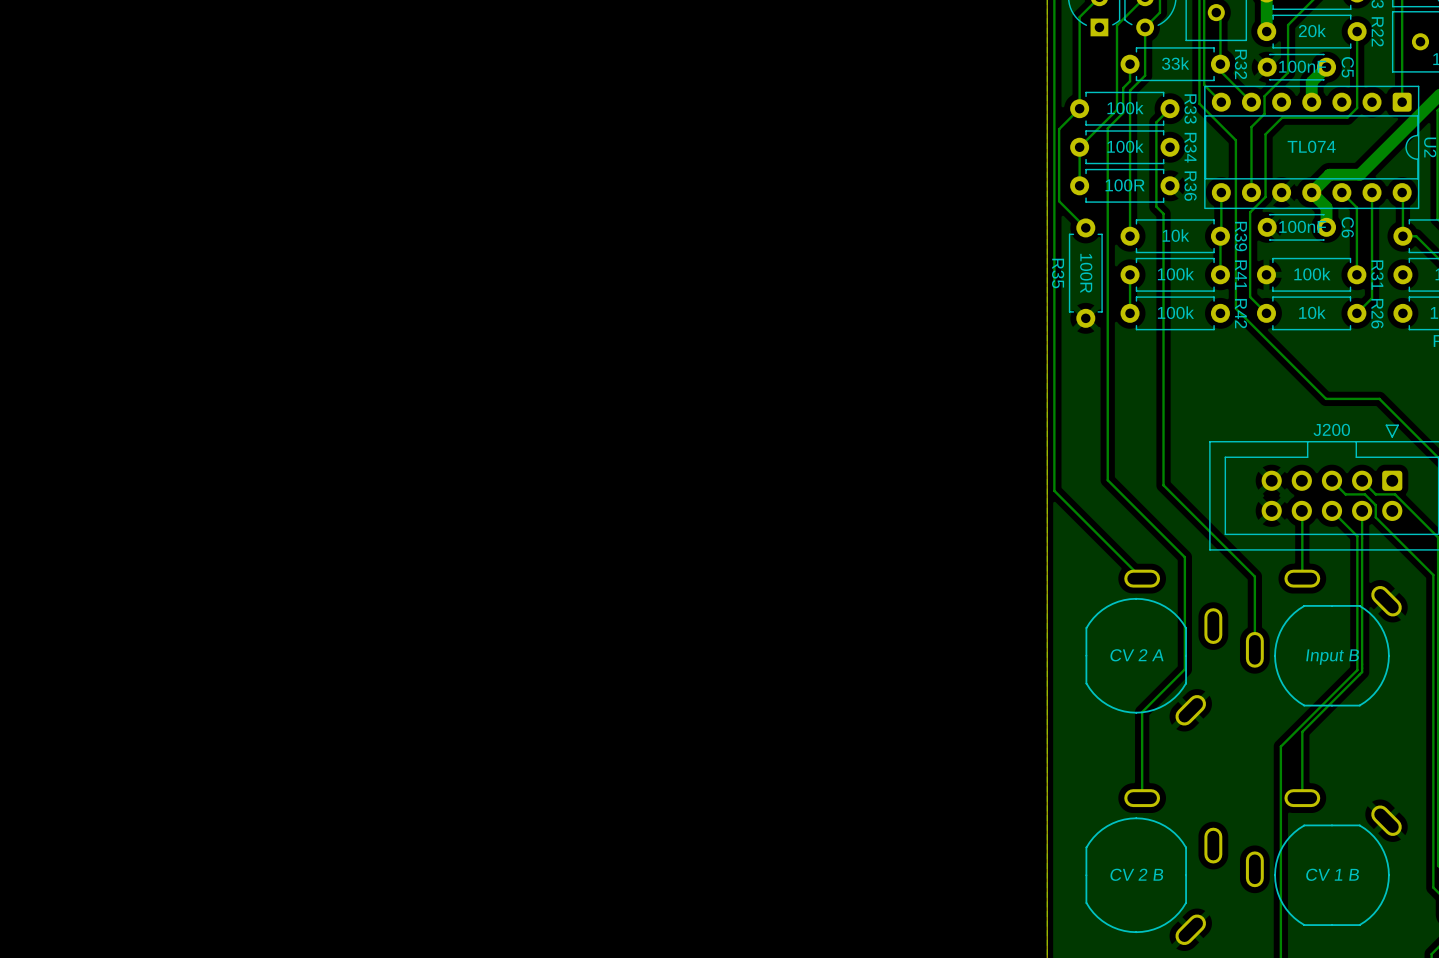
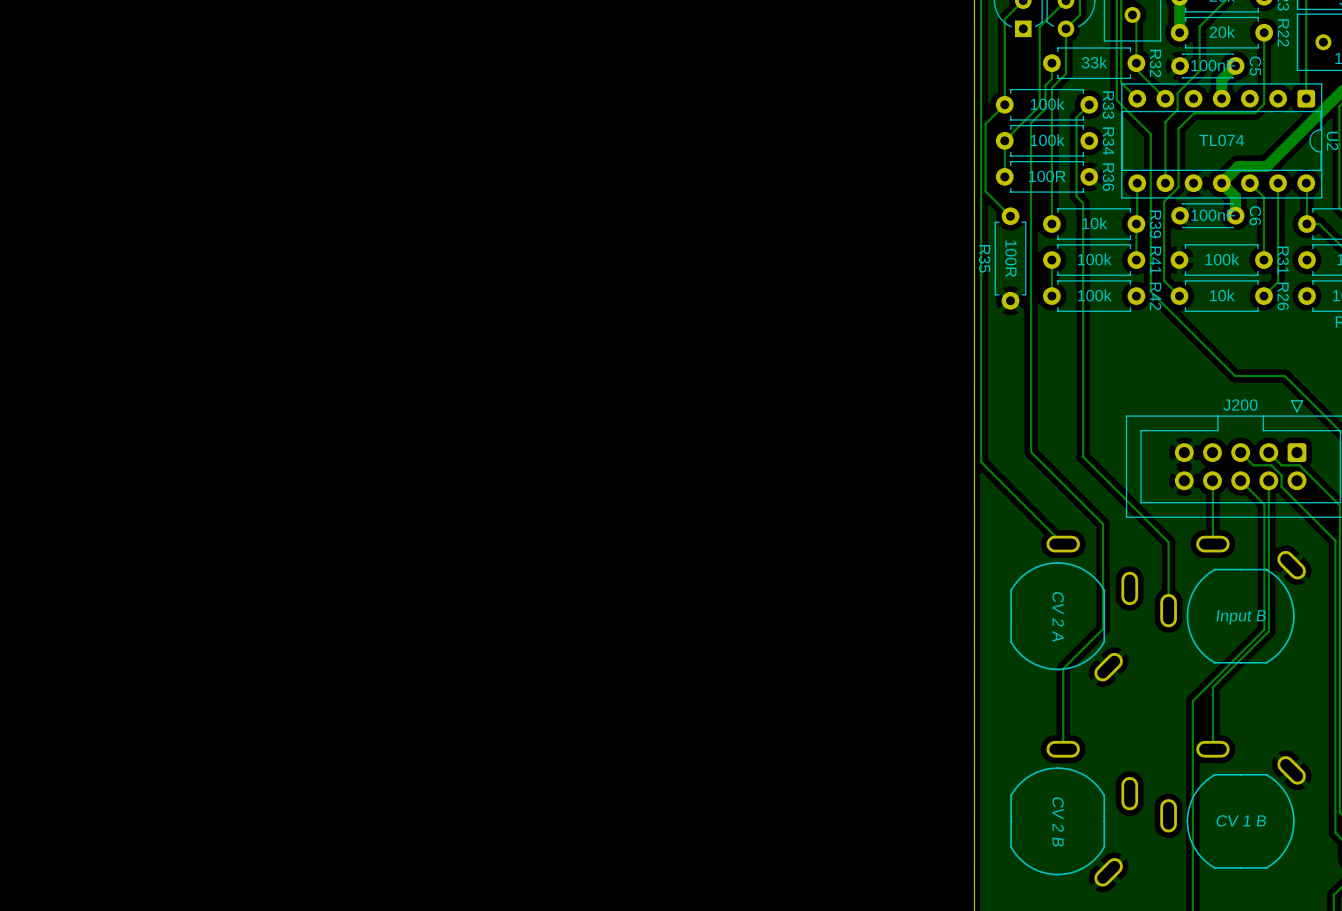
part text rotation: 0° (1136, 655) -> 90° clockwise (1058, 616)
part text rotation: 0° (1136, 874) -> 90° clockwise (1058, 821)

